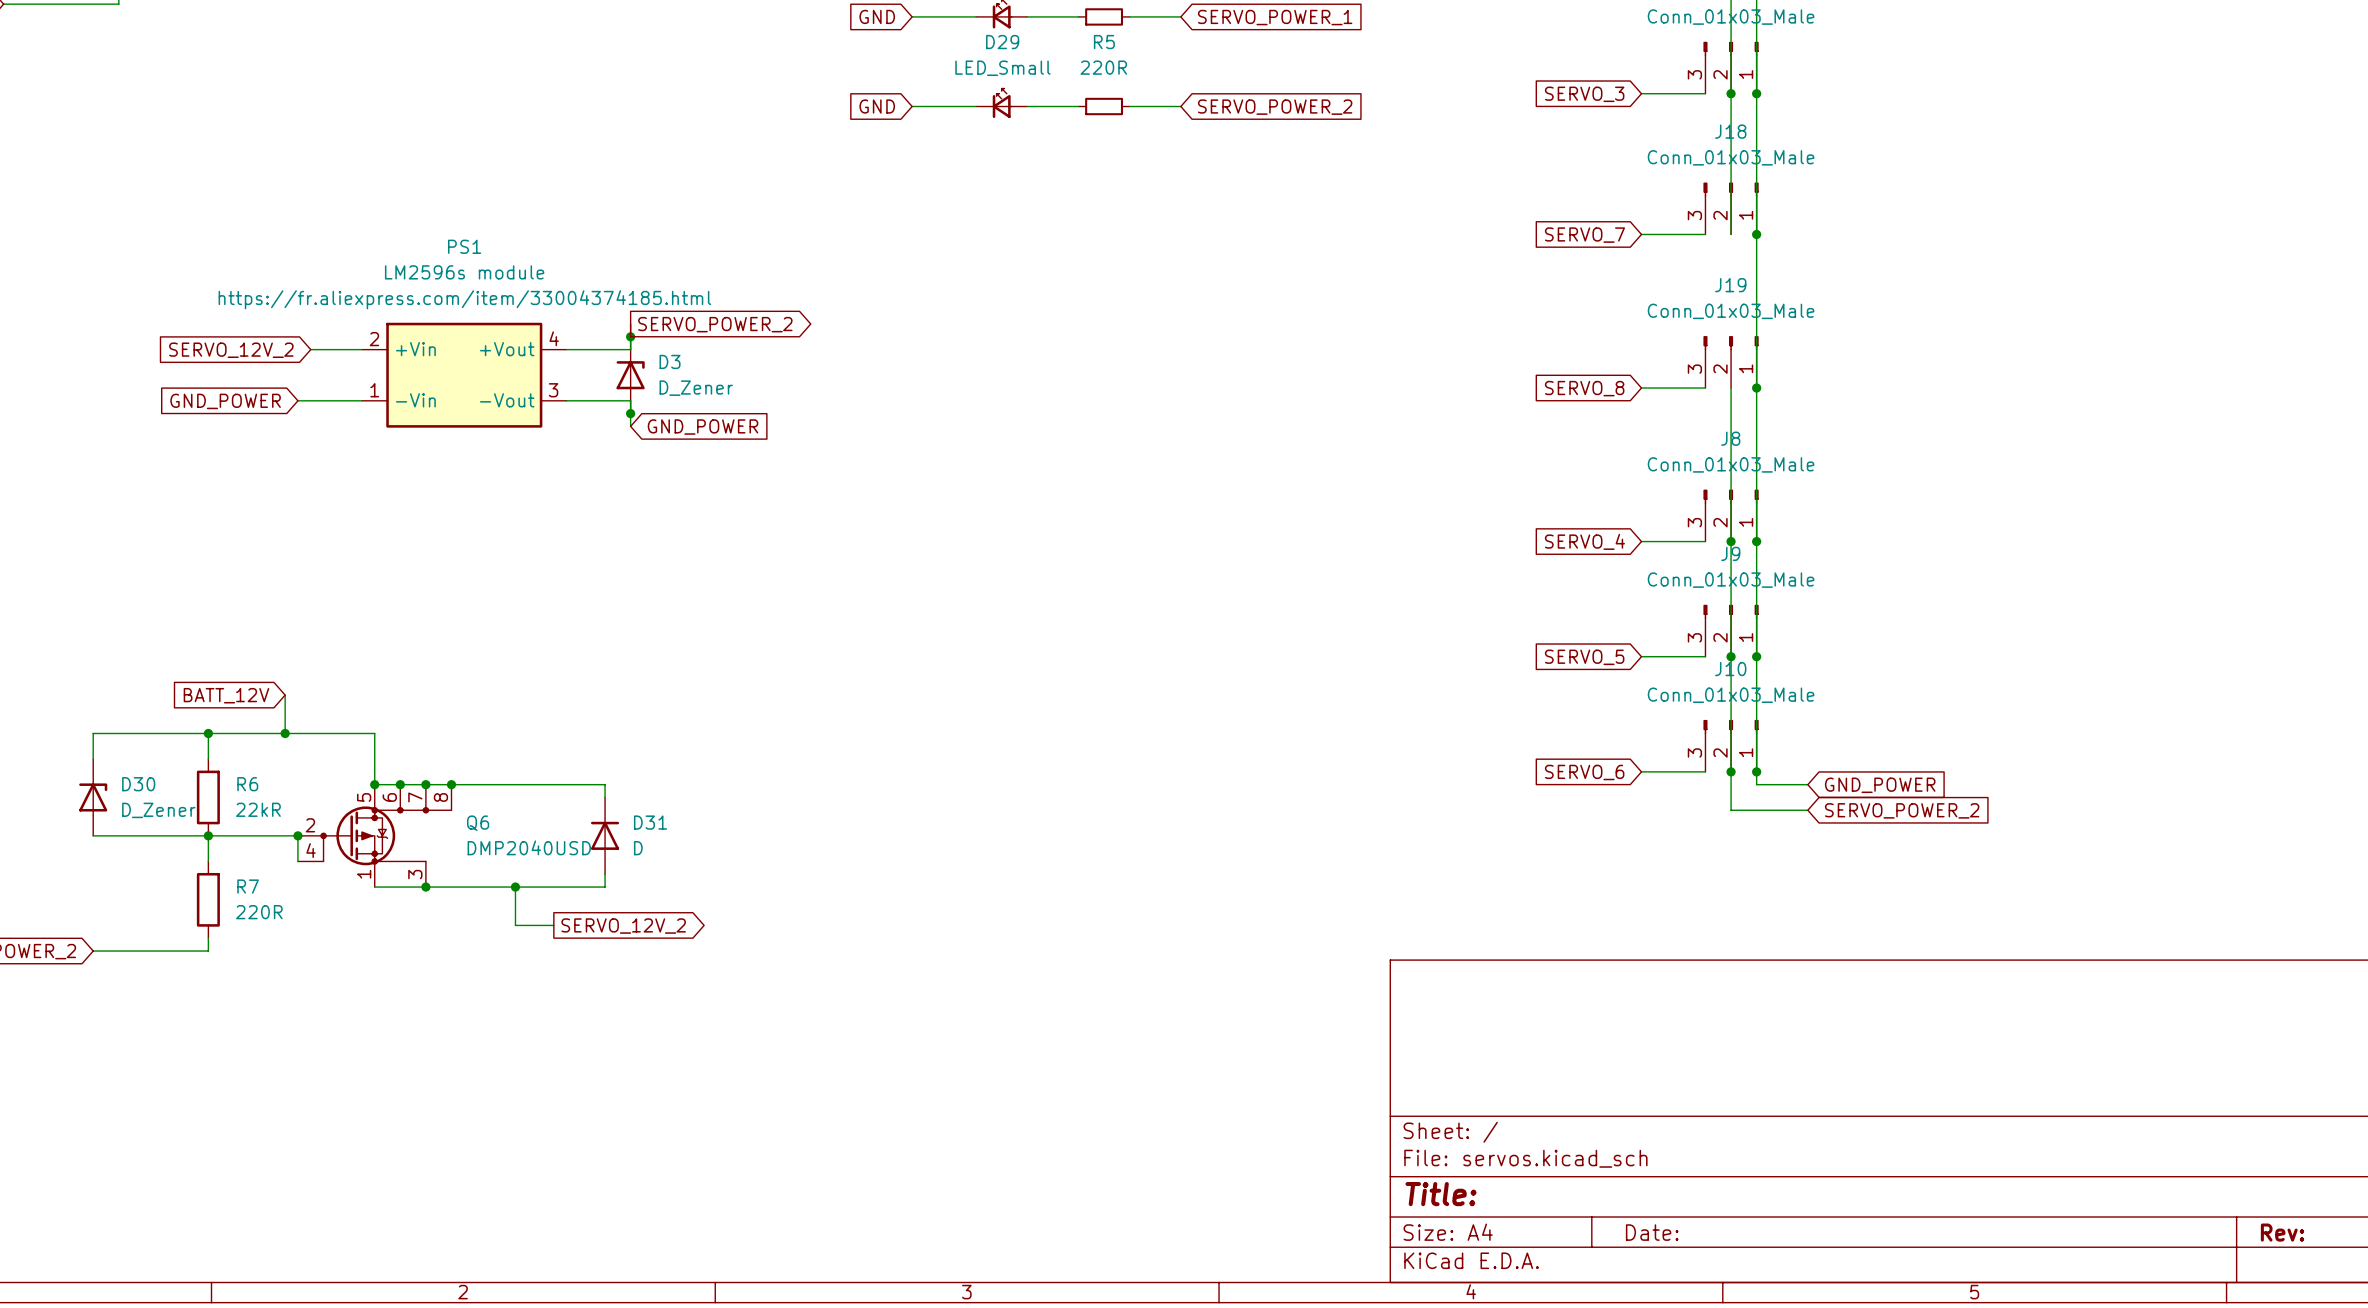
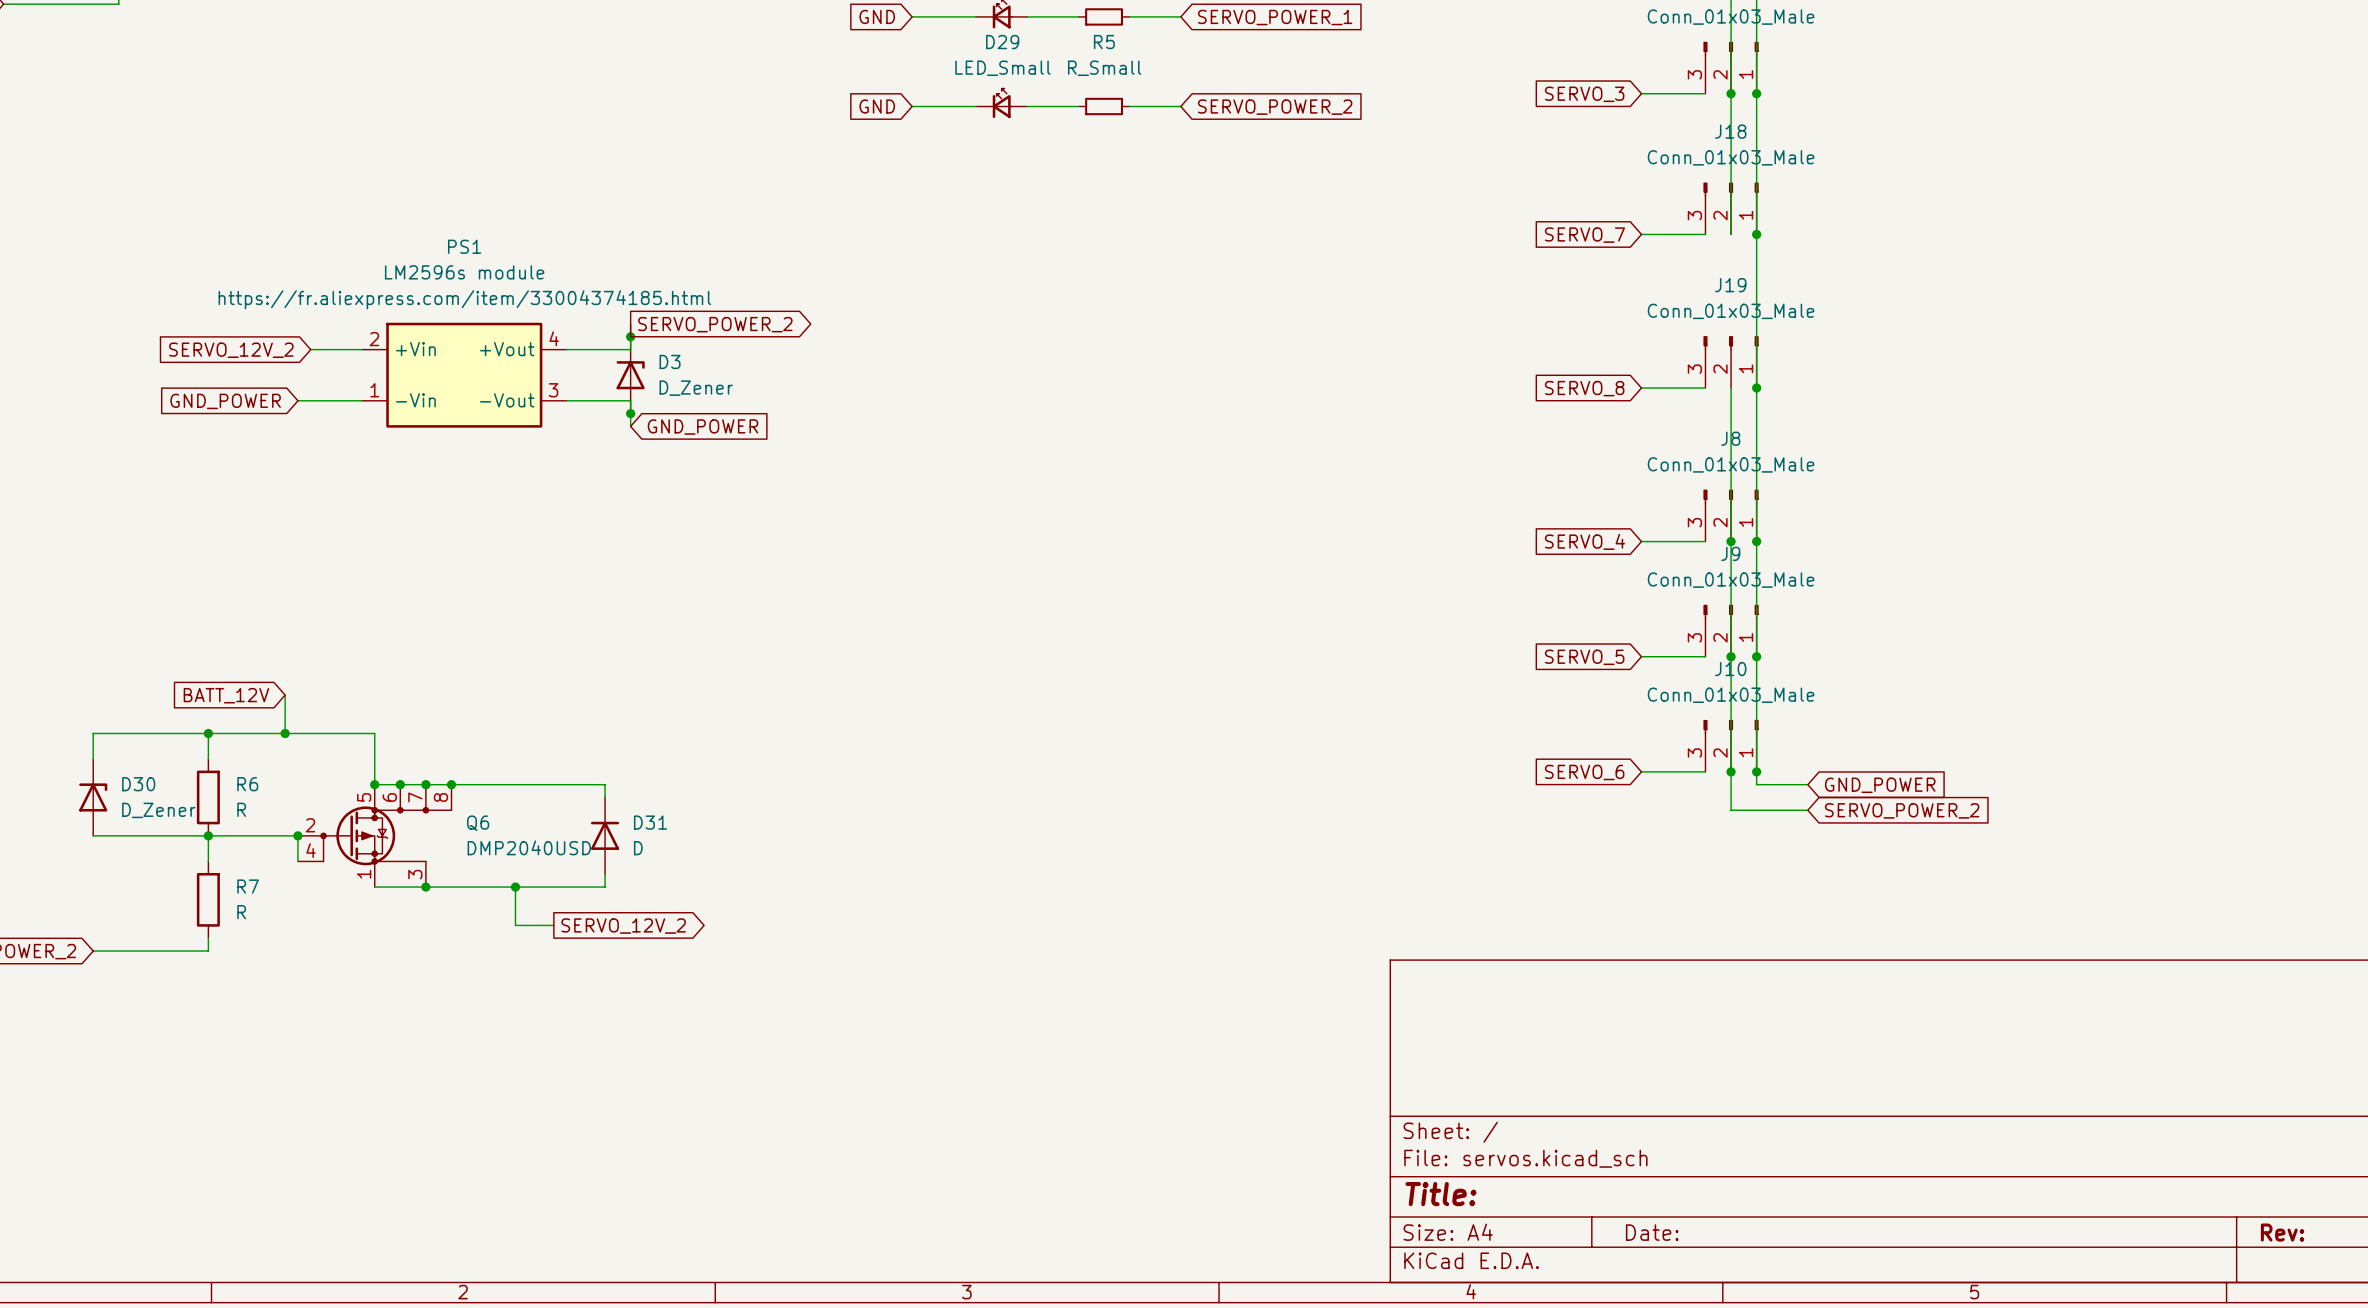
R5 value: 220R (1103, 67) -> R_Small (1104, 68)
R6 value: 22kR (258, 809) -> R (241, 809)
R7 value: 220R (259, 912) -> R (241, 912)

